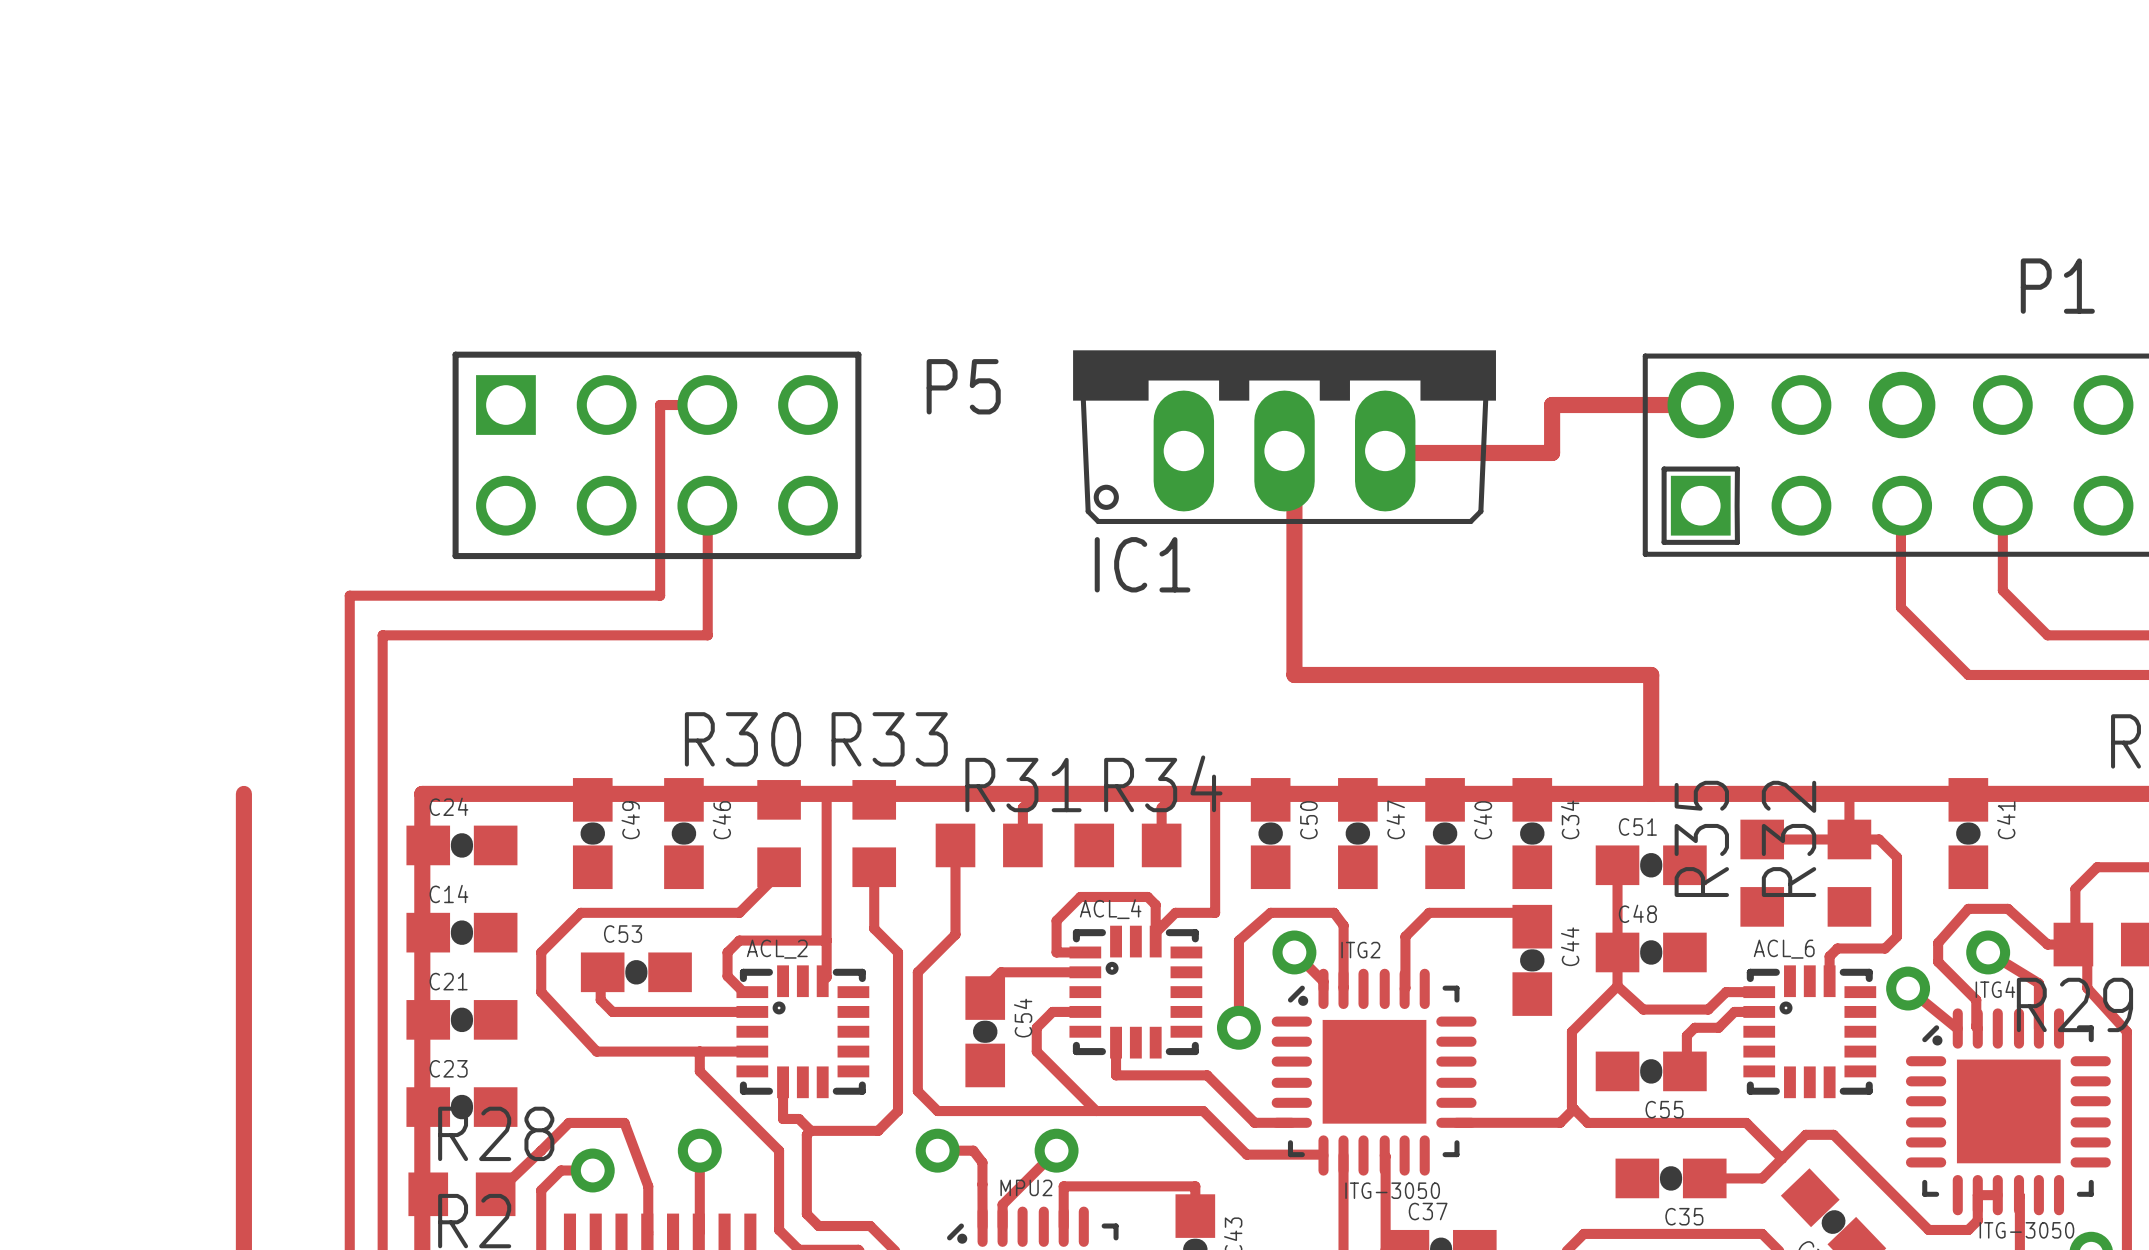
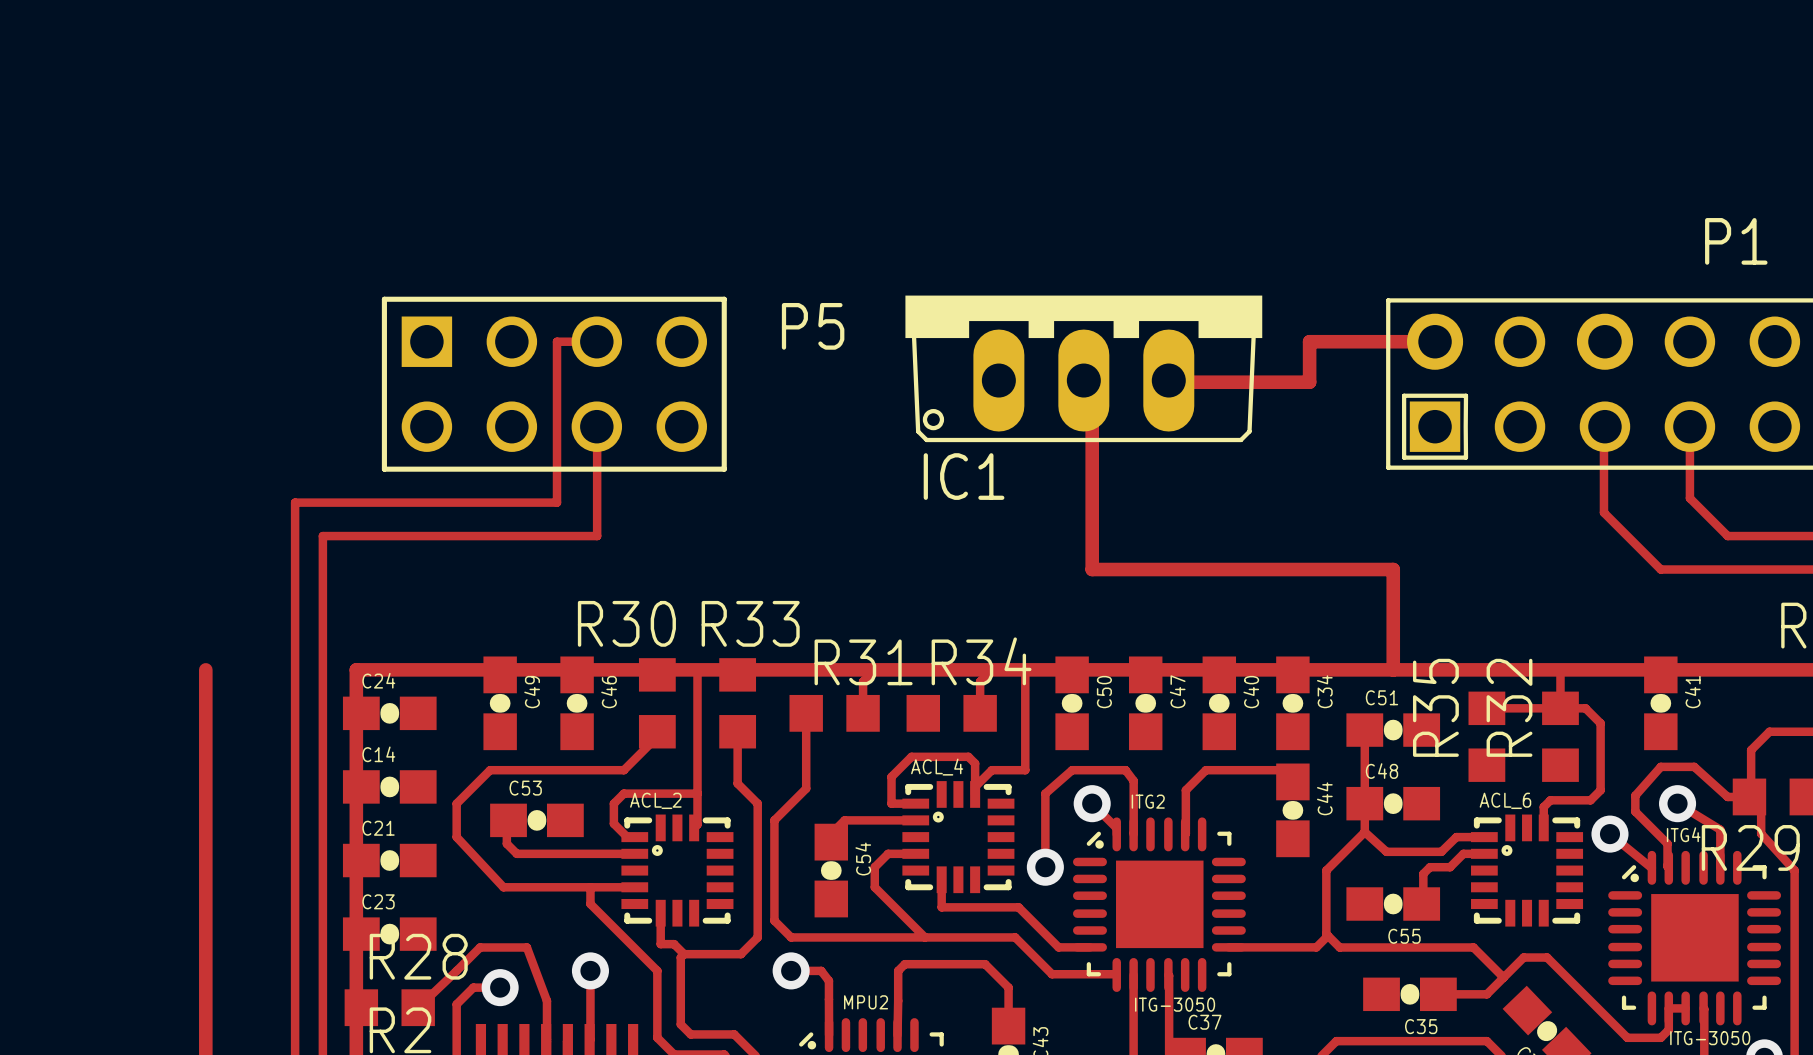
track: (1056, 1150) (1002, 1204) (1002, 1226) -> none
via: (1056, 1150) -> none
track: (1195, 1186) (1063, 1186) (1063, 1226) -> (1008, 1001) (1008, 987) (985, 964) (904, 964) (898, 970) (897, 1035)

